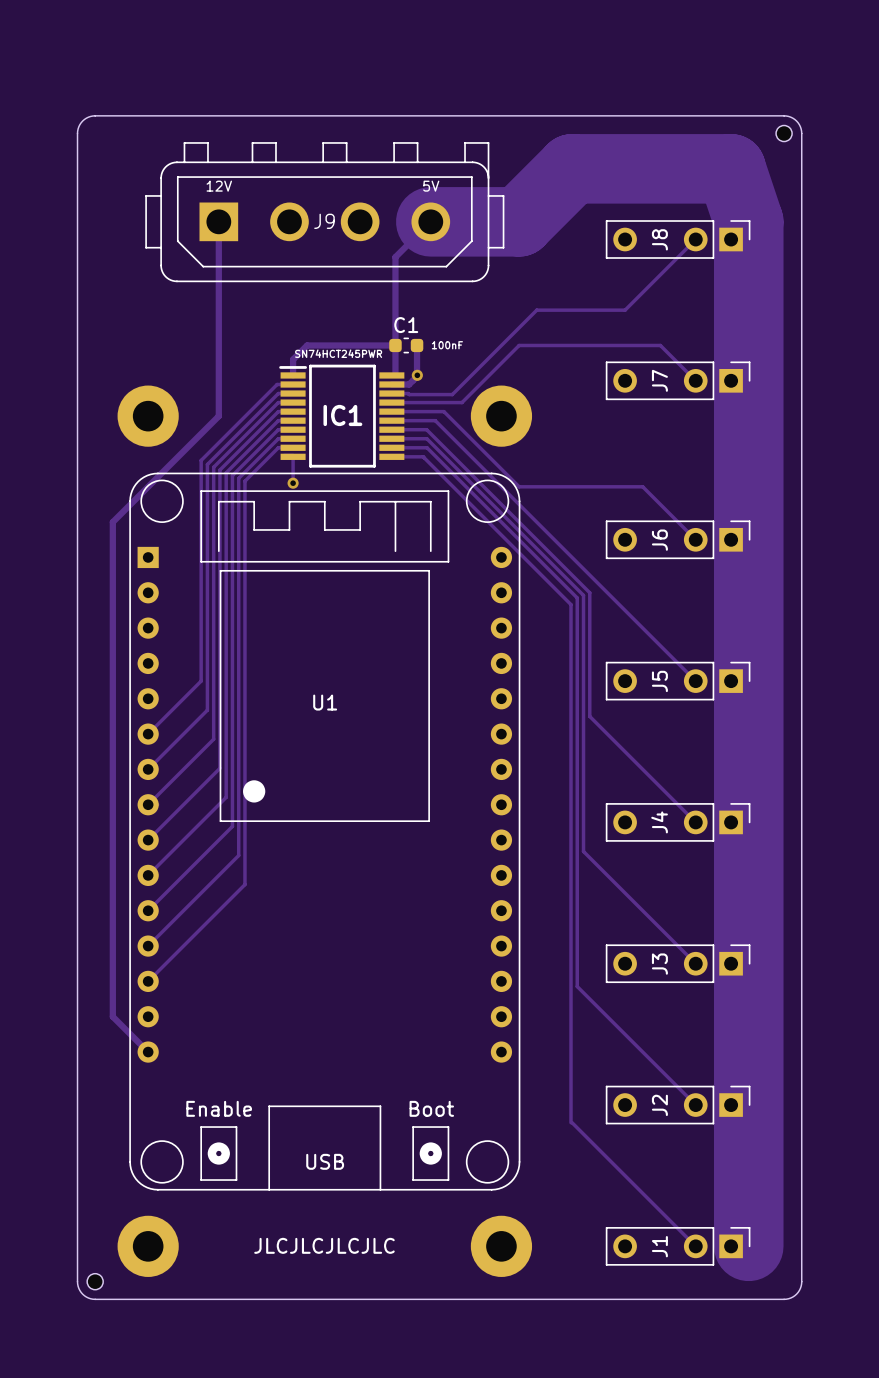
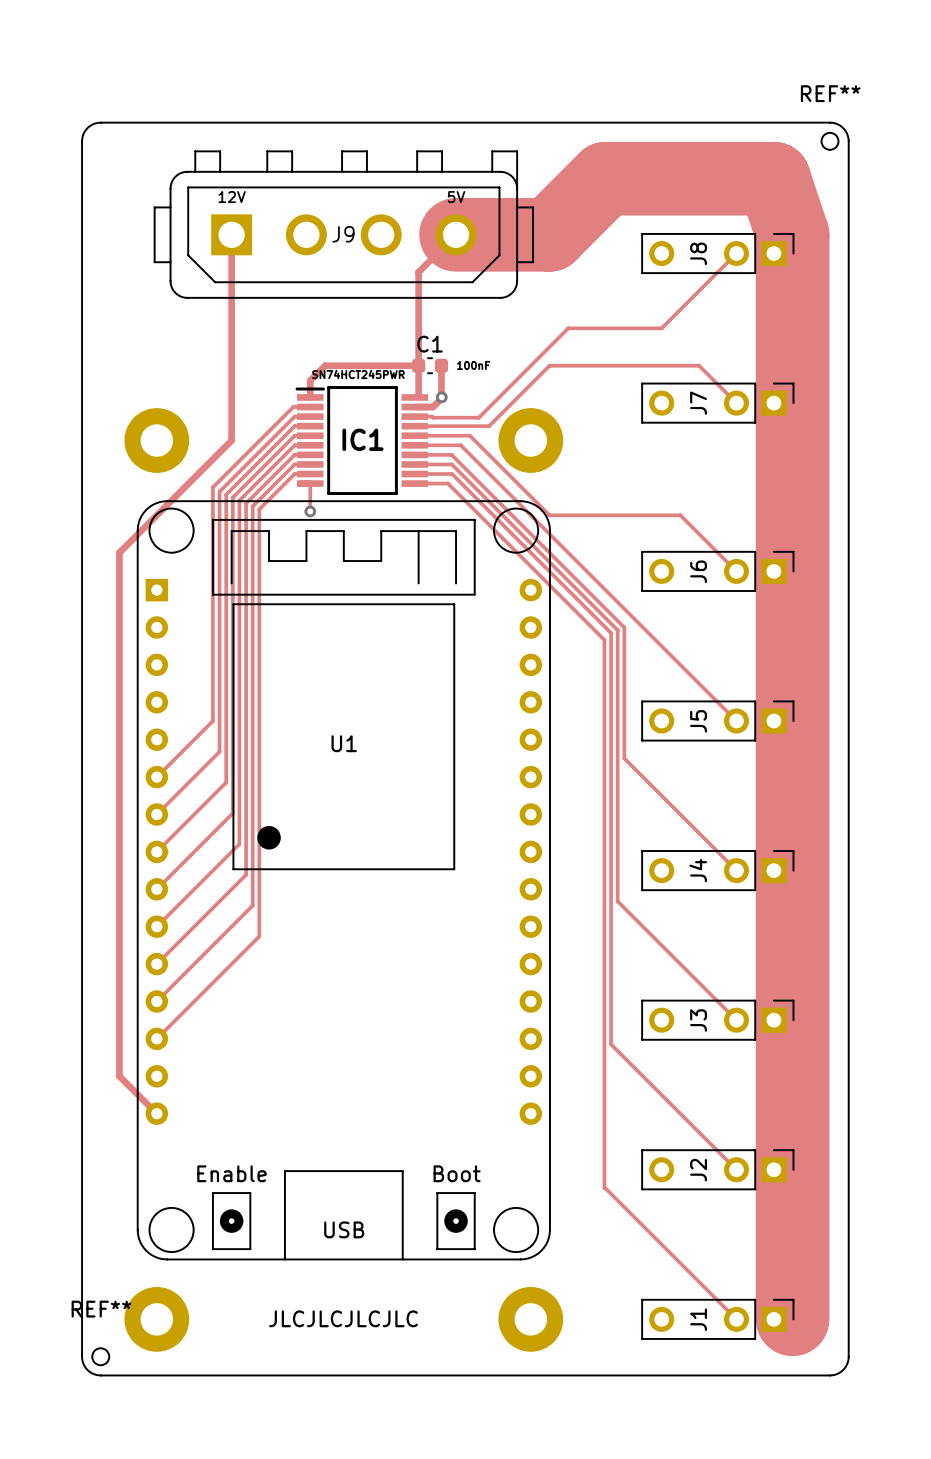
REF** name: none -> REF** (830, 93)
REF** name: none -> REF** (101, 1309)

